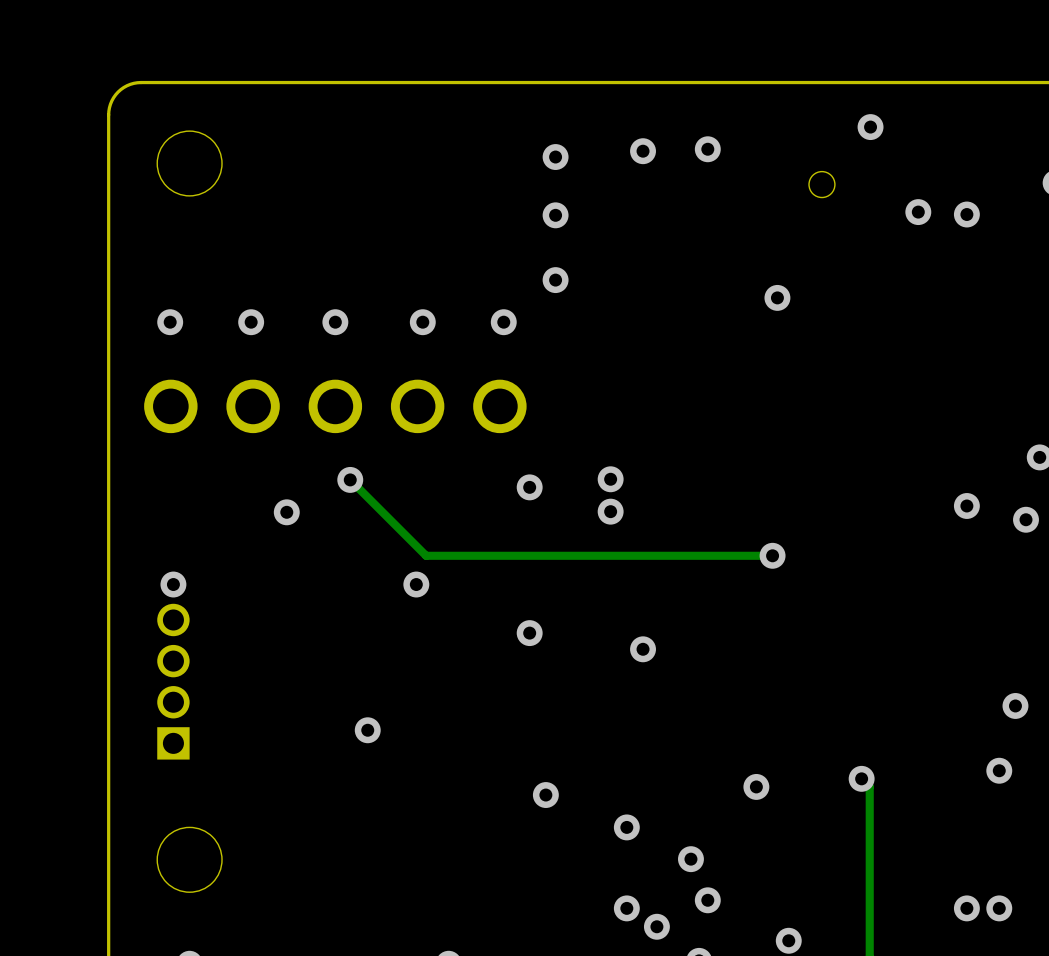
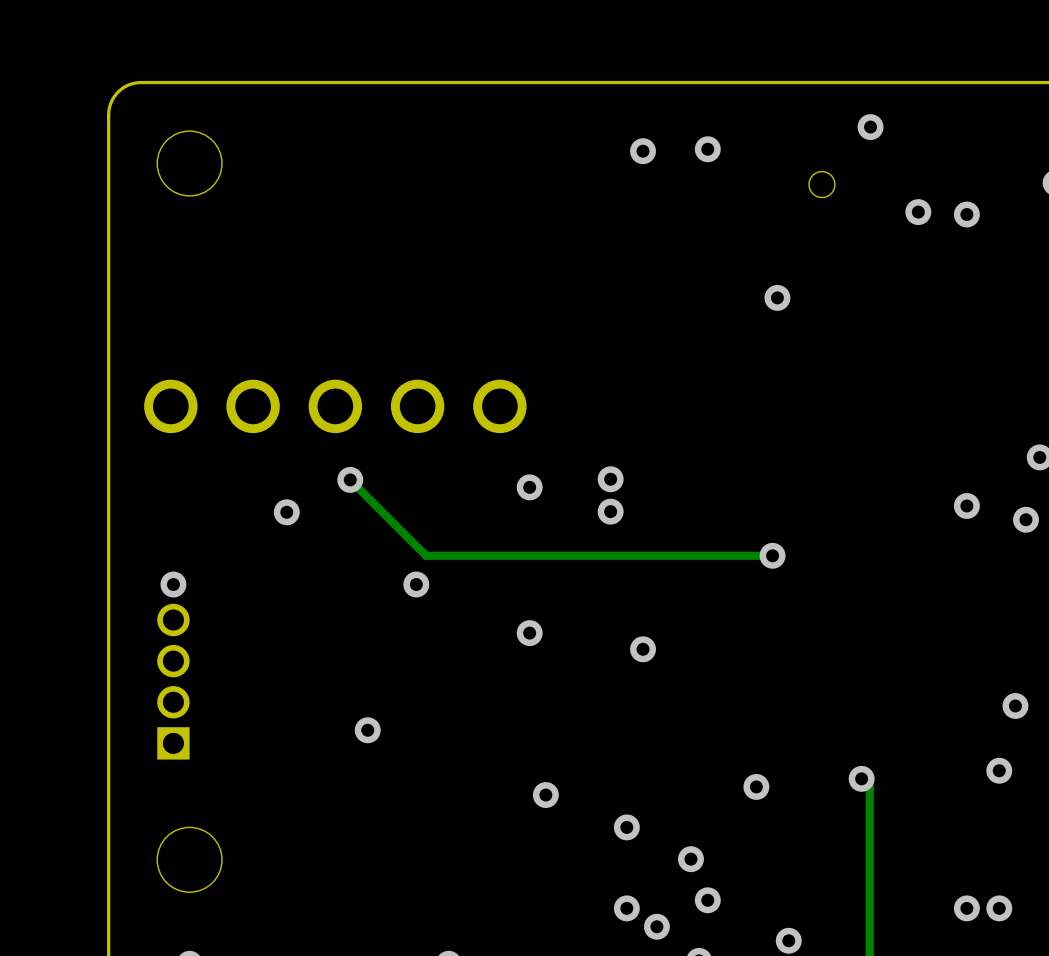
via: (555, 157) -> none
via: (555, 215) -> none
via: (555, 280) -> none
via: (170, 322) -> none
via: (251, 322) -> none
via: (335, 322) -> none
via: (422, 322) -> none
via: (503, 322) -> none

